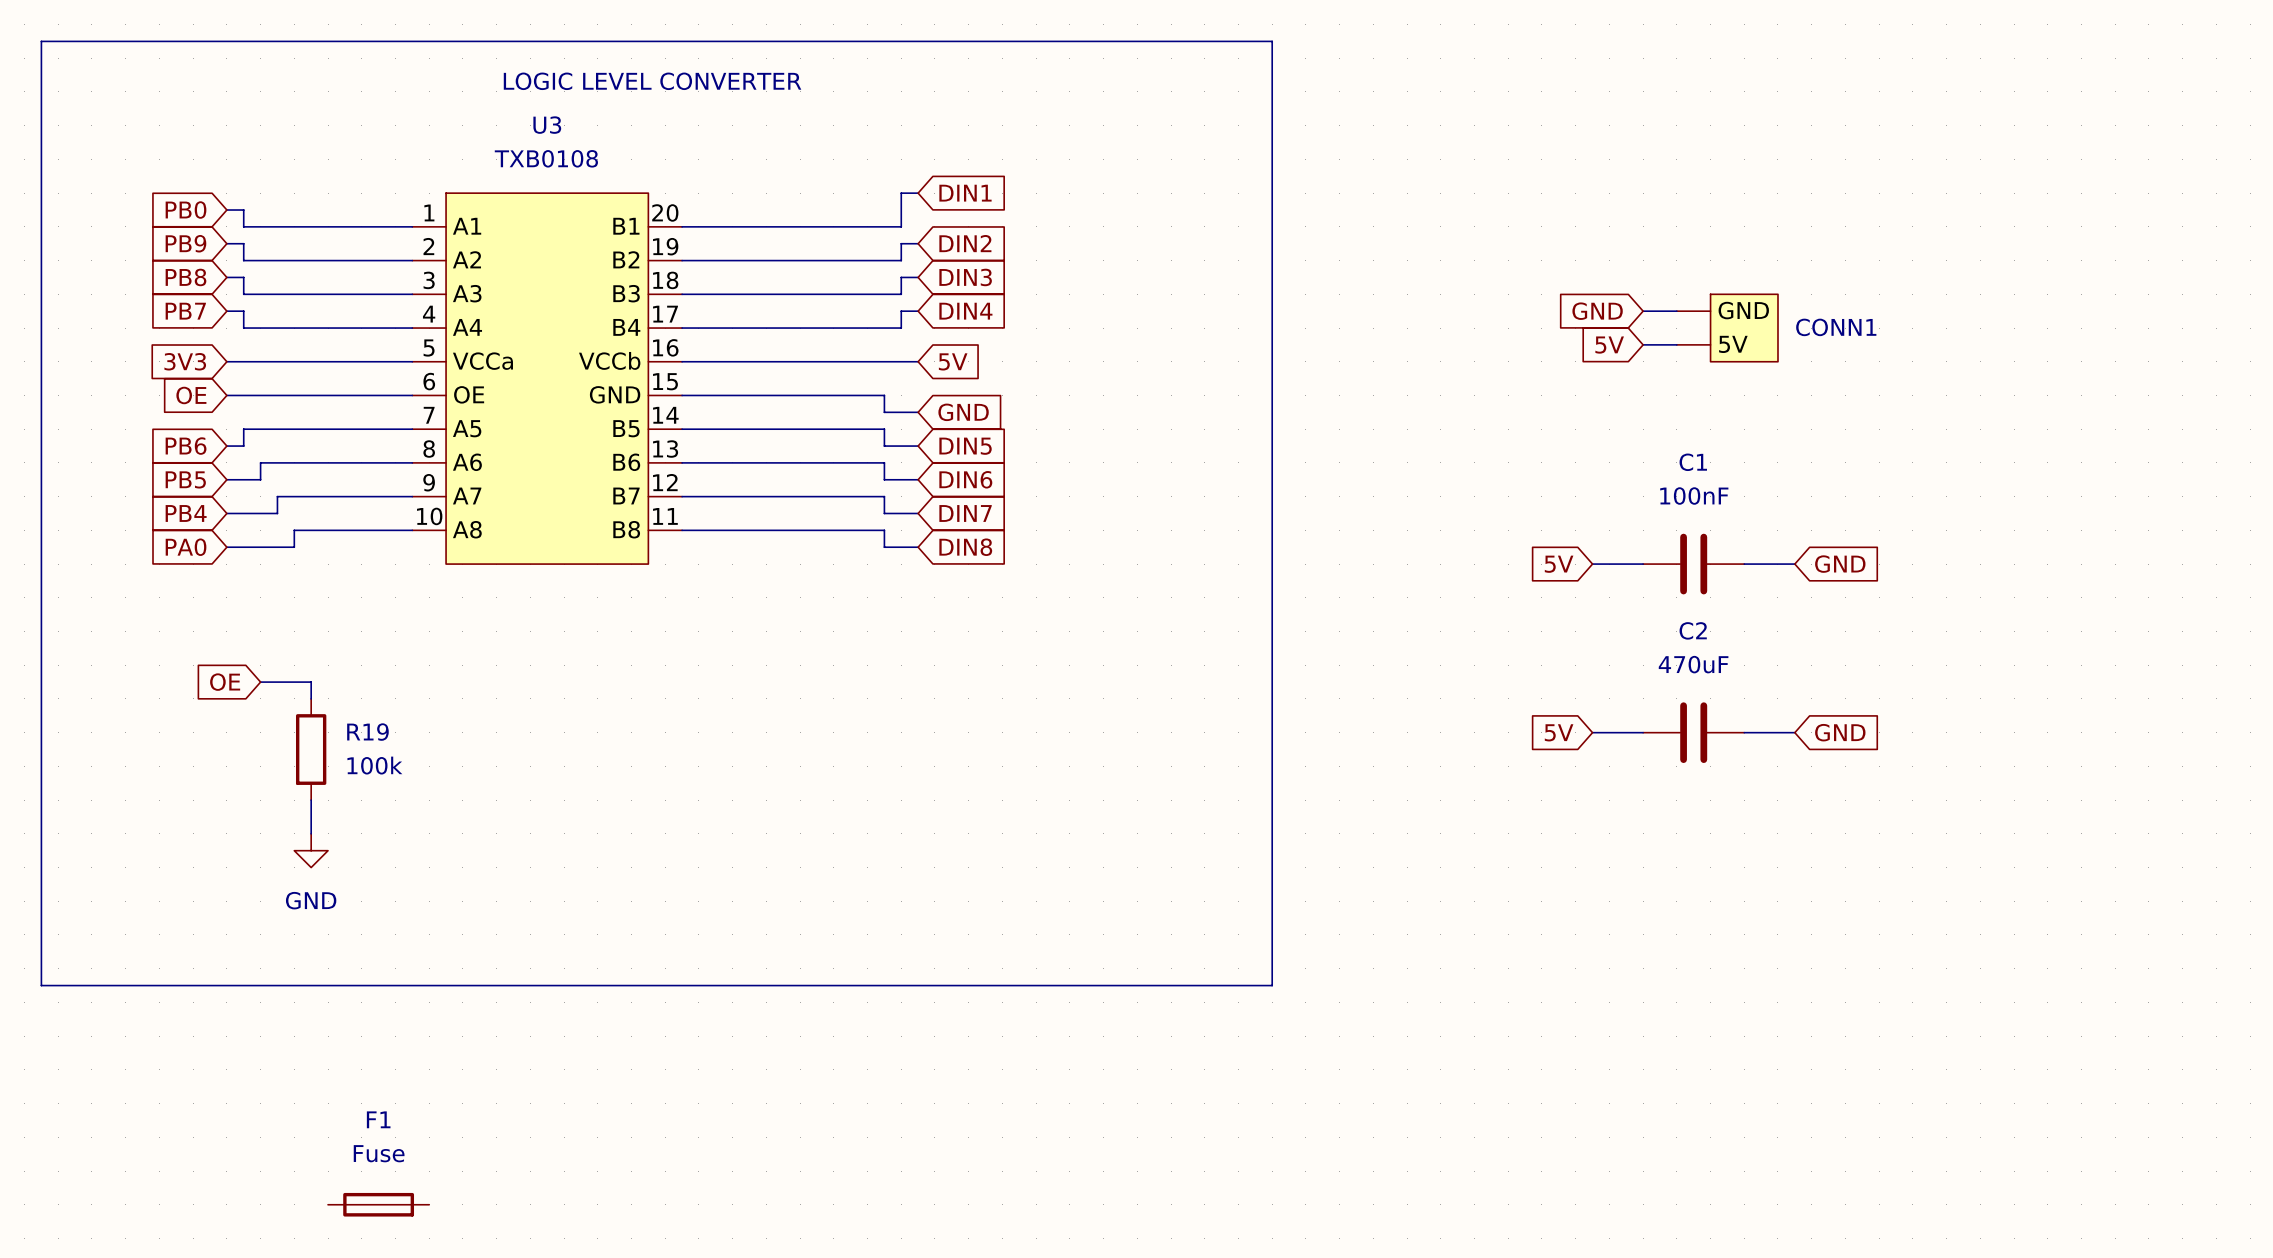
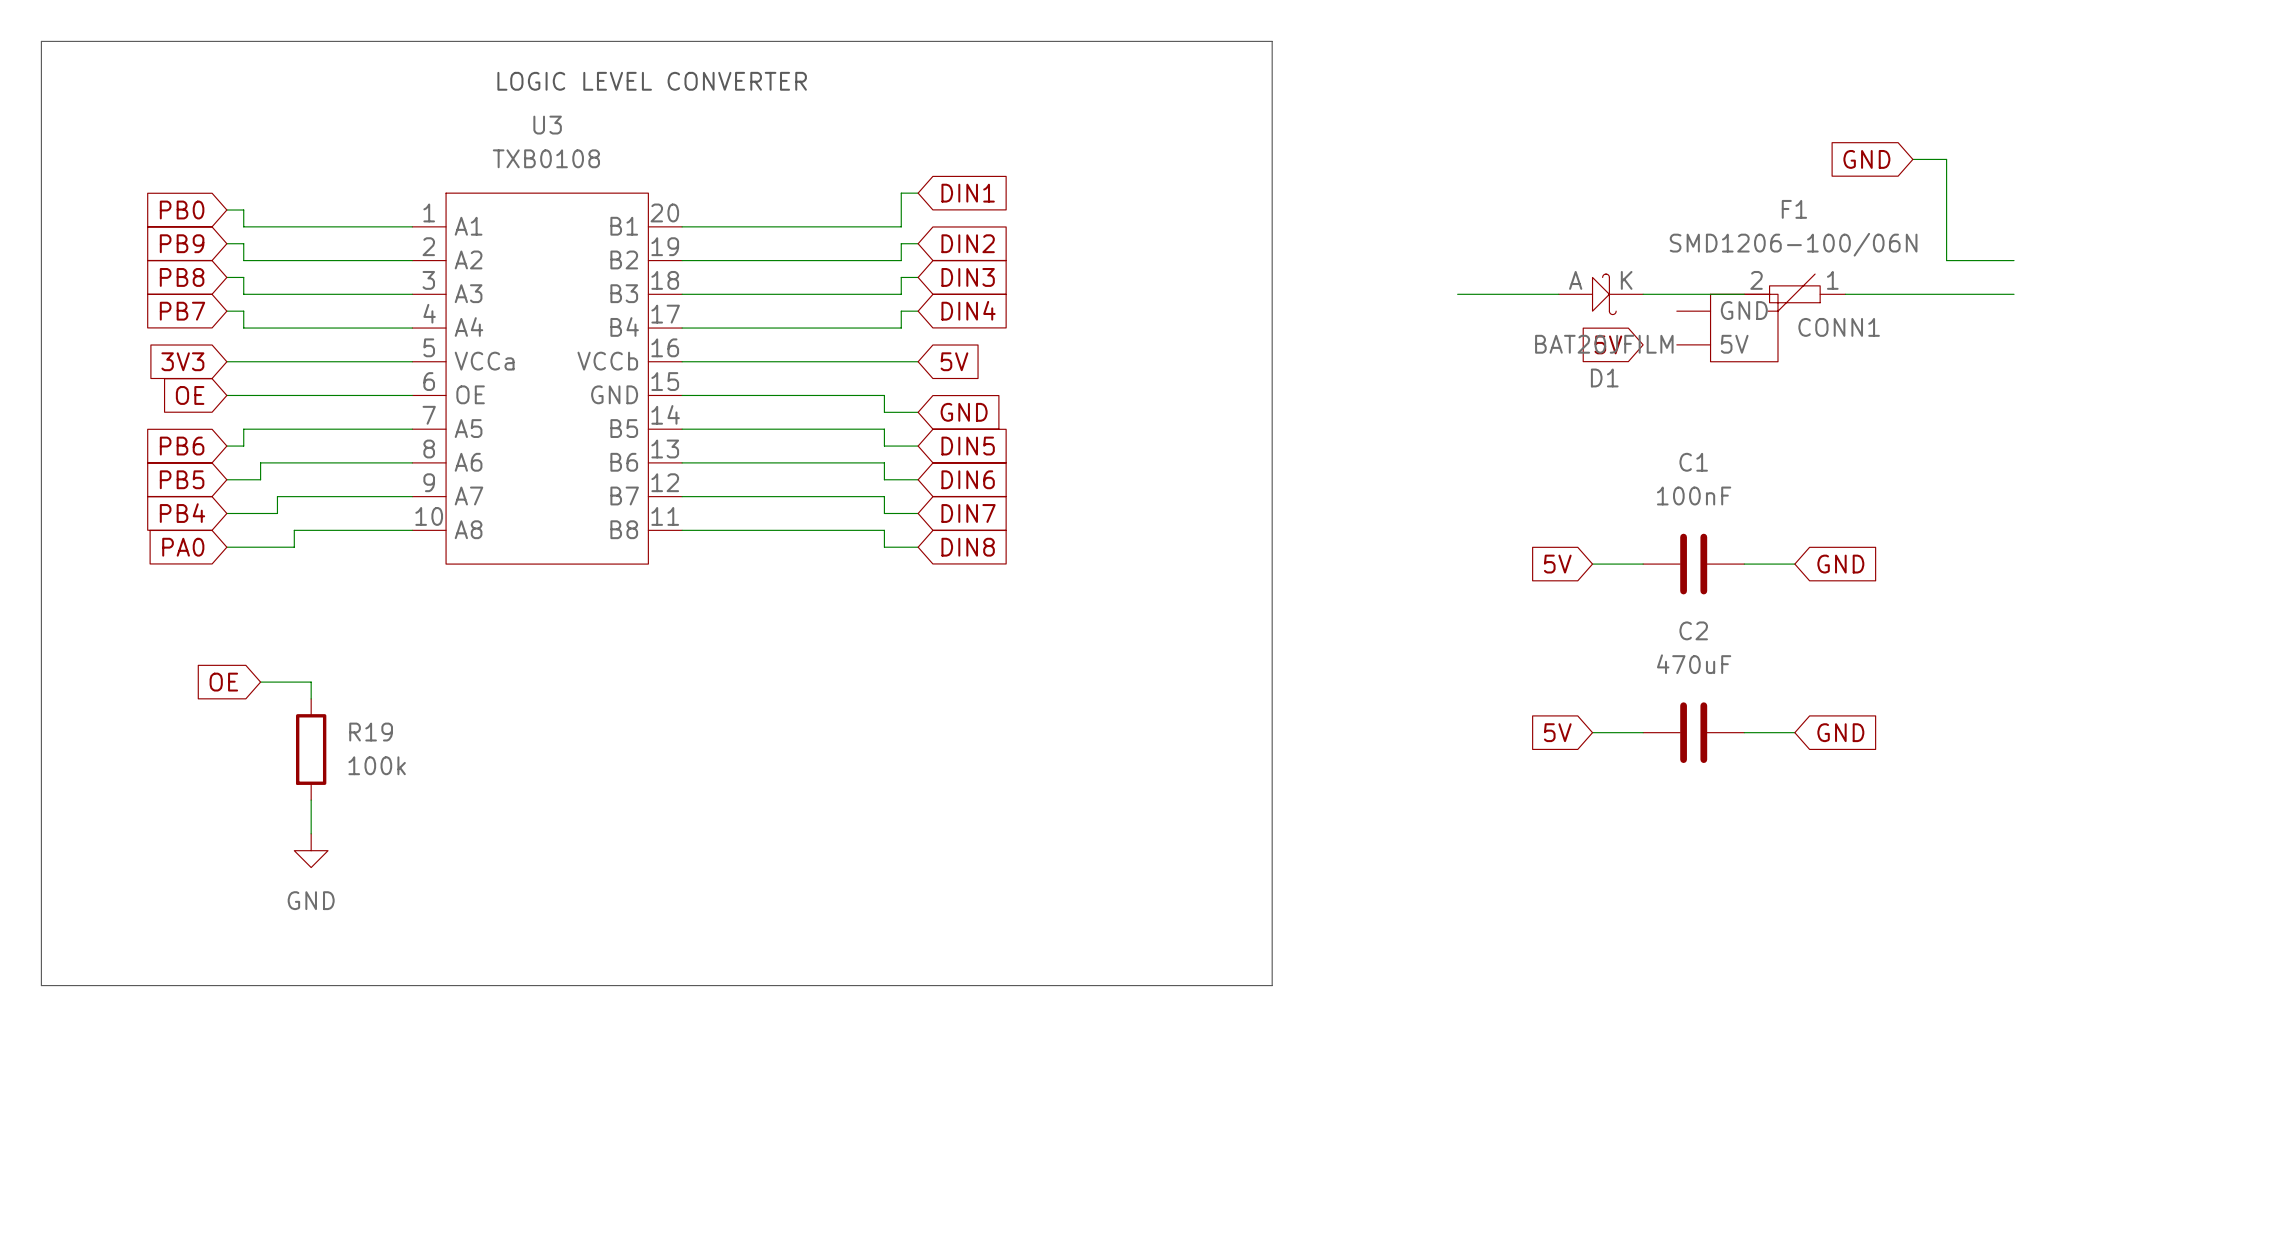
wire: none -> (1912, 159) (1946, 159) (1946, 260) (2014, 260)
wire: none -> (1457, 294) (1558, 294)
D1: none -> BAT20JFILM (1600, 294)
wire: none -> (1643, 294) (1744, 294)
wire: none -> (1845, 294) (2014, 294)
global label position: GND (1597, 311) -> GND (1866, 159)
wire: (1643, 311) (1676, 311) -> none
wire: (1643, 344) (1676, 344) -> none
F1 value: Fuse (379, 1153) -> SMD1206-100/06N (1793, 244)
F1 symbol: [328, 1192, 430, 1217] -> [1744, 274, 1846, 312]

